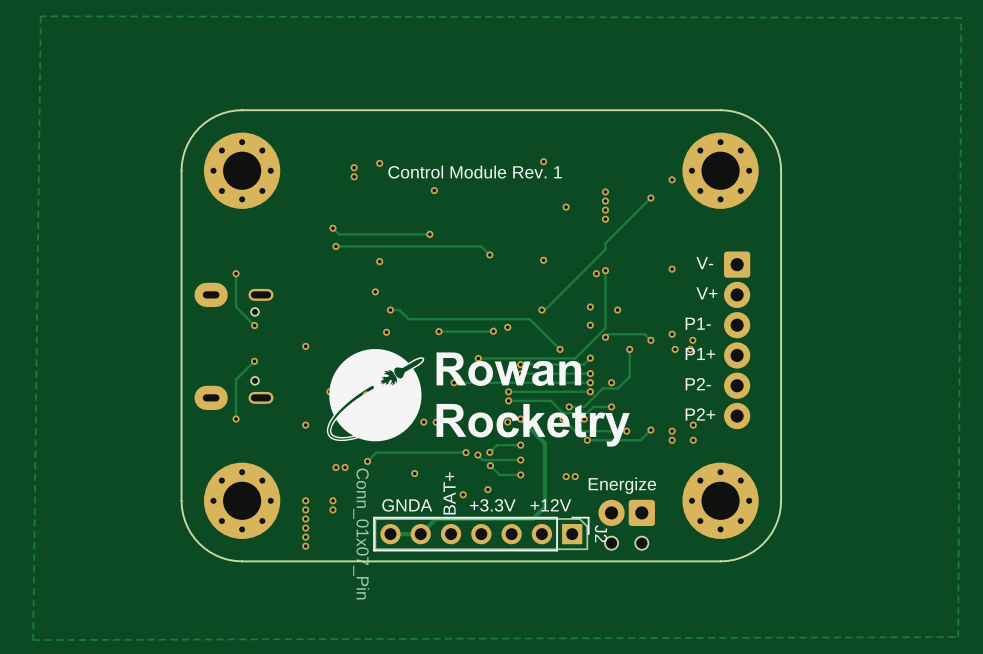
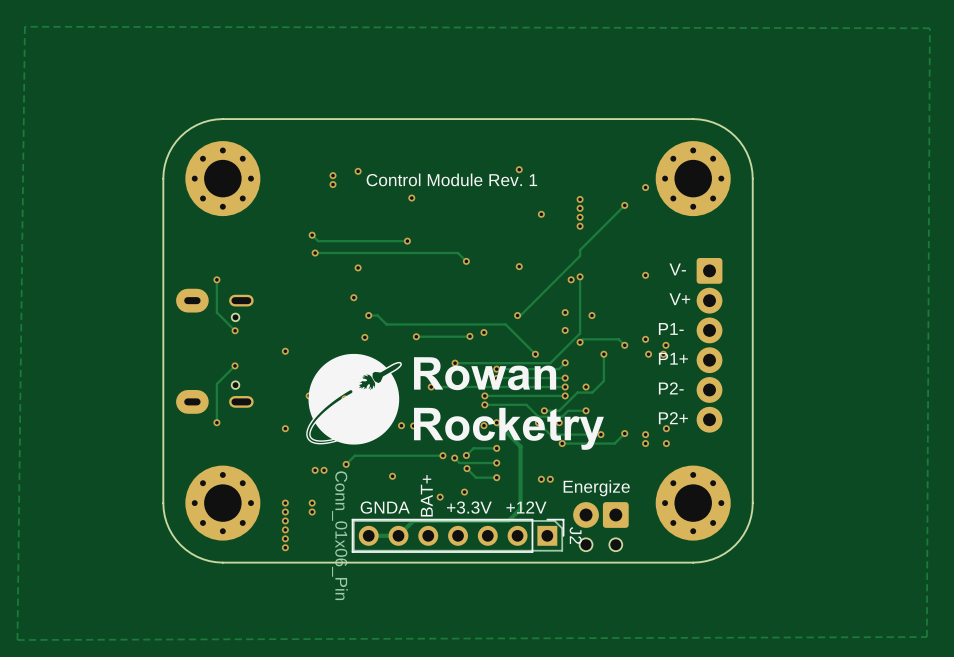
J2 value: Conn_01x07_Pin (361, 534) -> Conn_01x06_Pin (339, 535)

